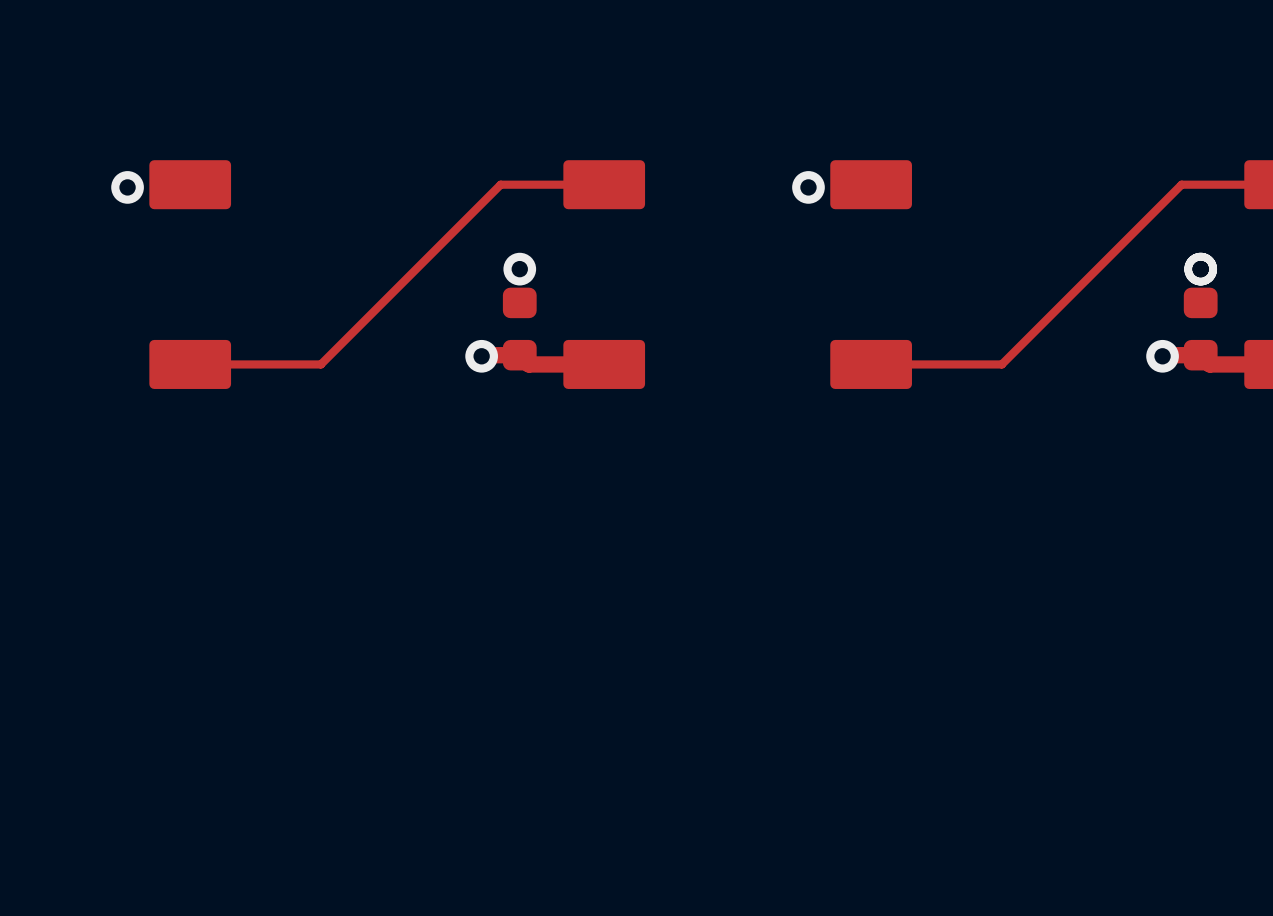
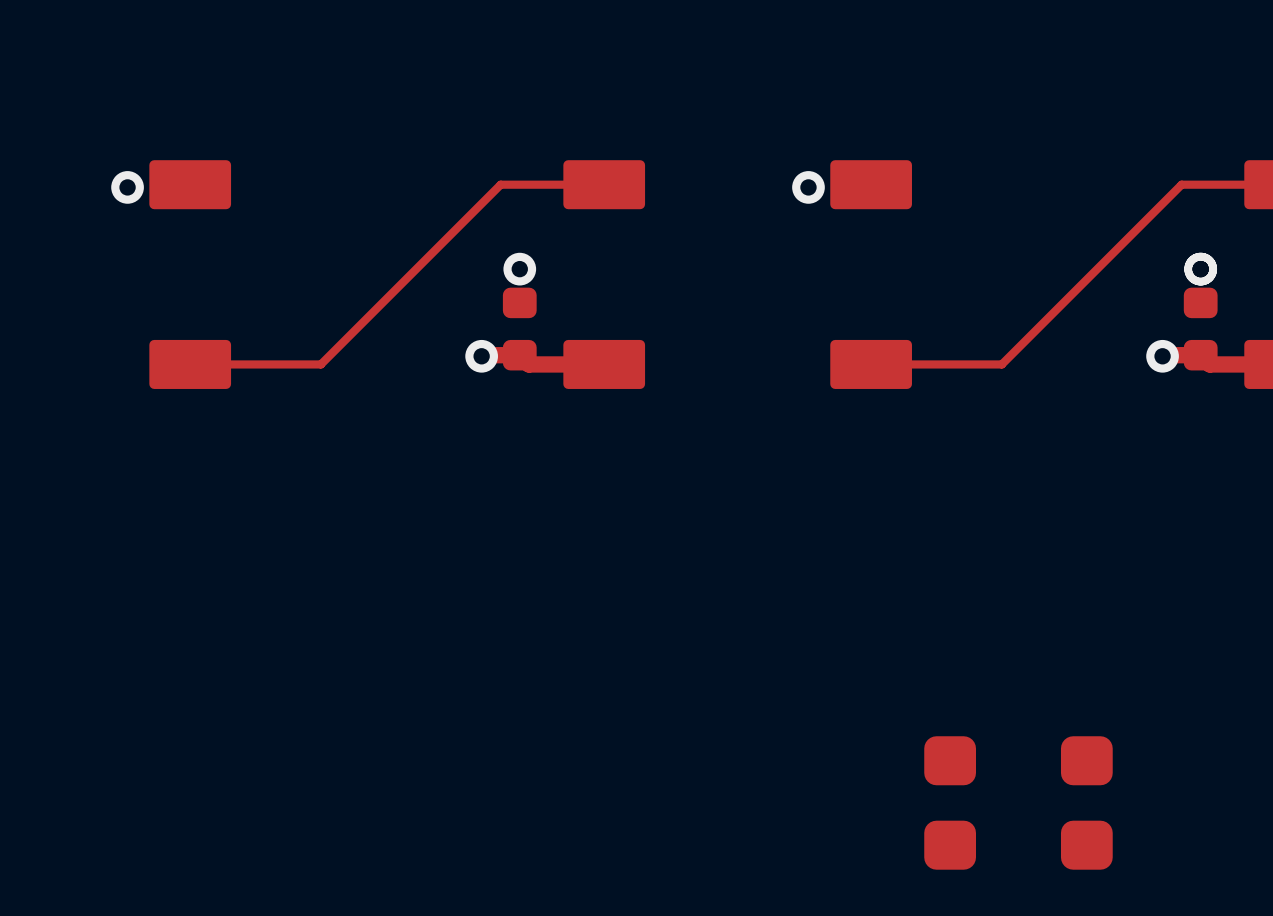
part: none -> (950, 802)
part: none -> (1086, 802)

